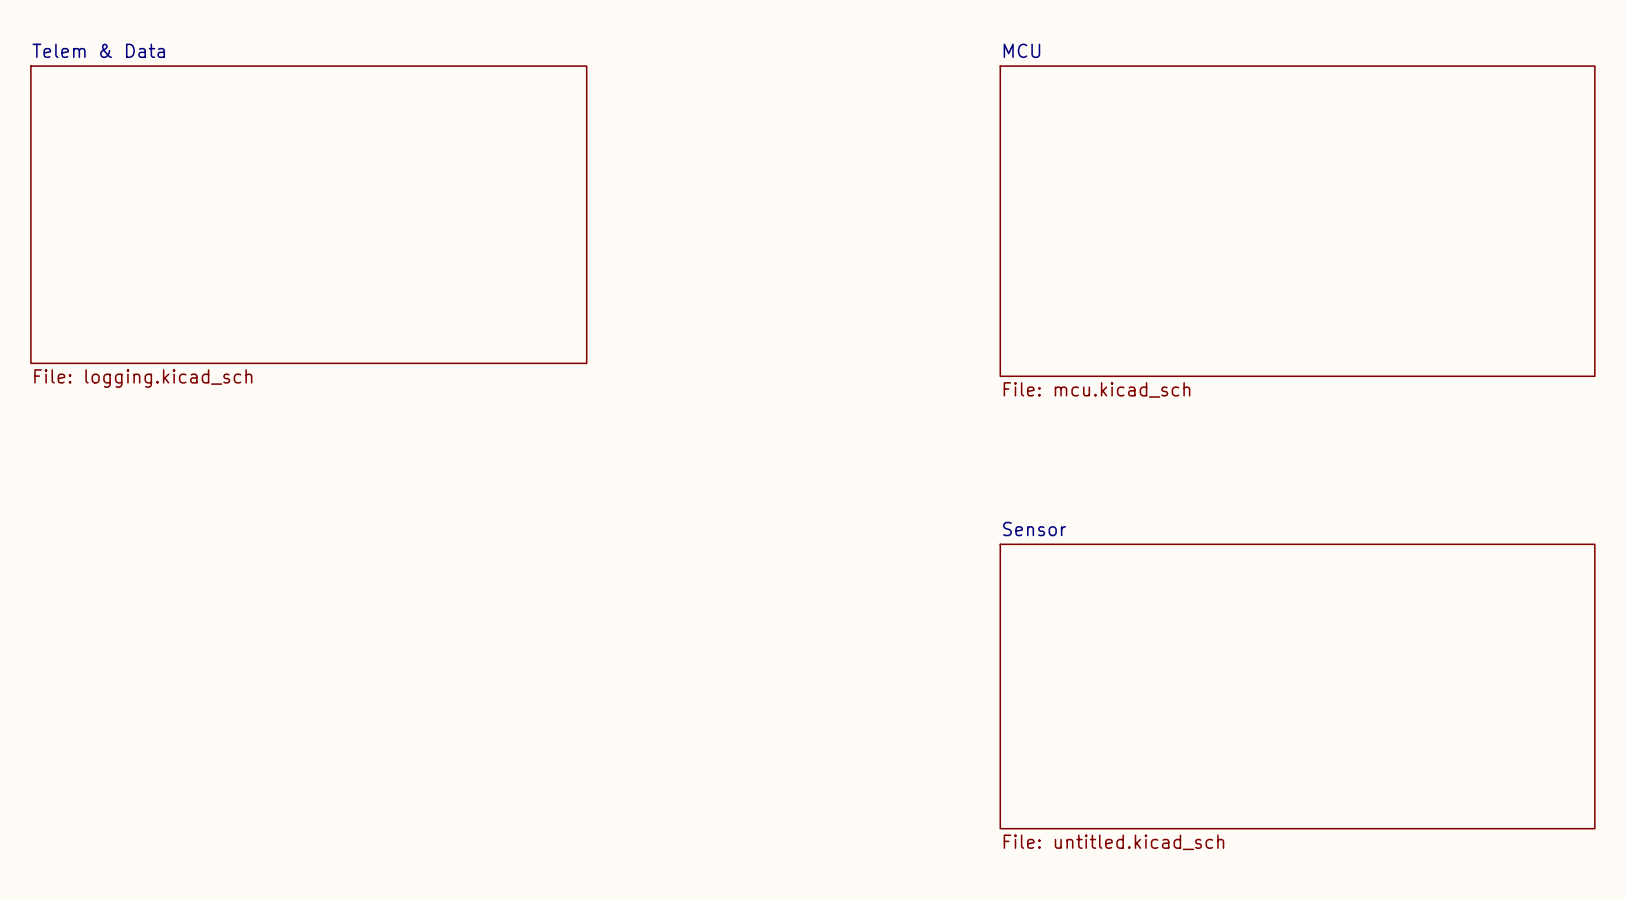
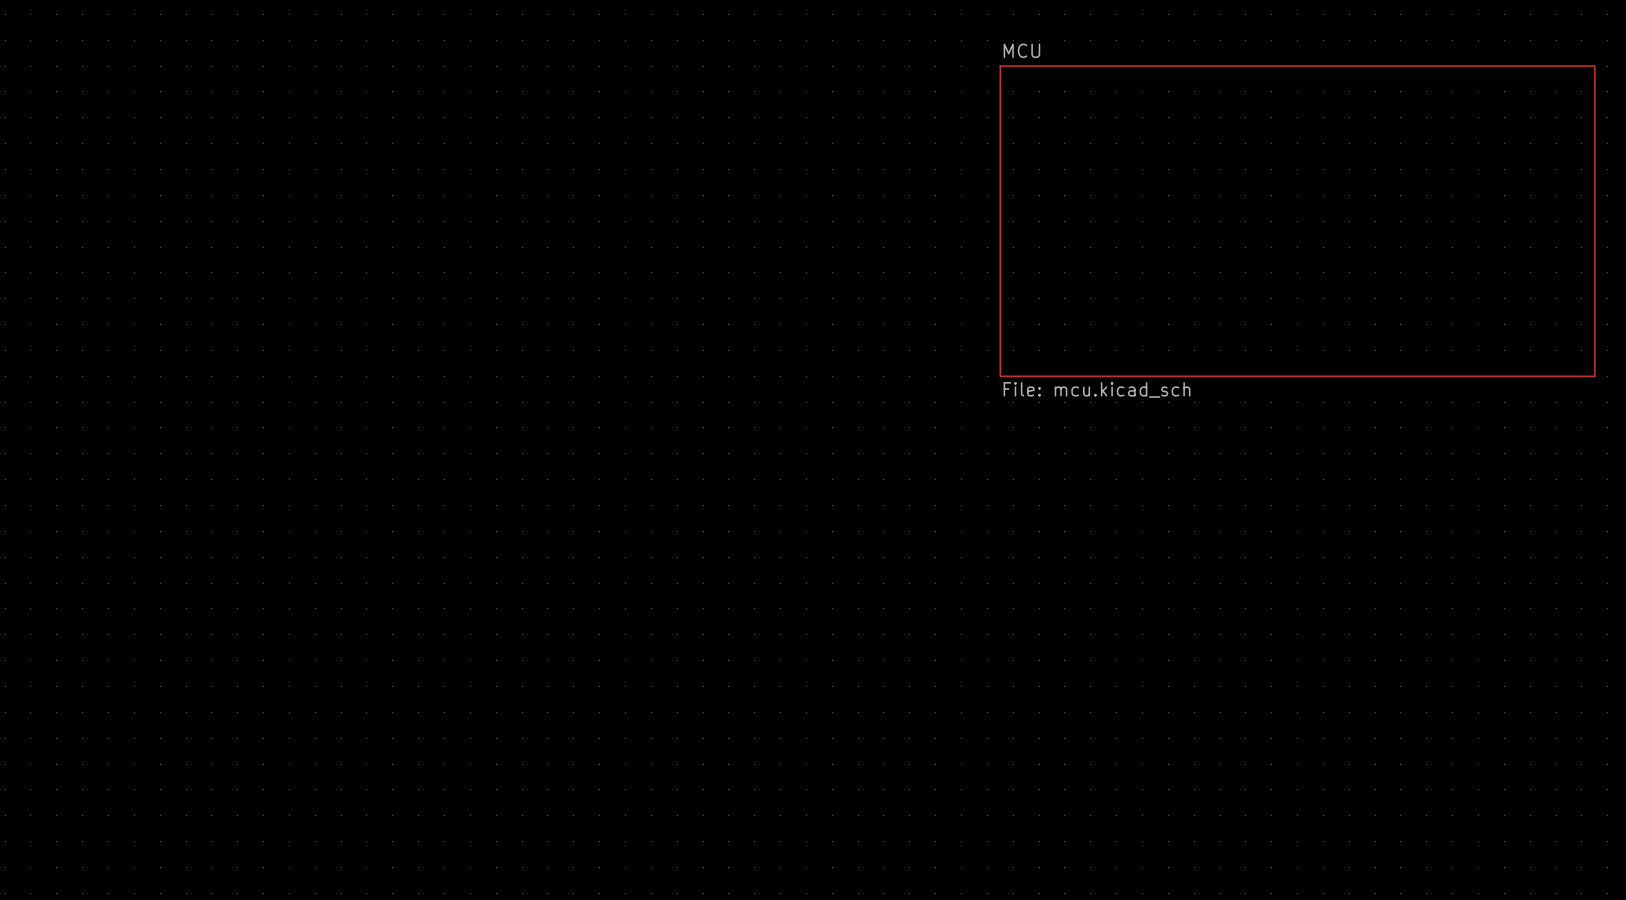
sheet Telem & Data: File: logging.kicad_sch (308, 214) -> none
sheet Sensor: File: untitled.kicad_sch (1297, 686) -> none

